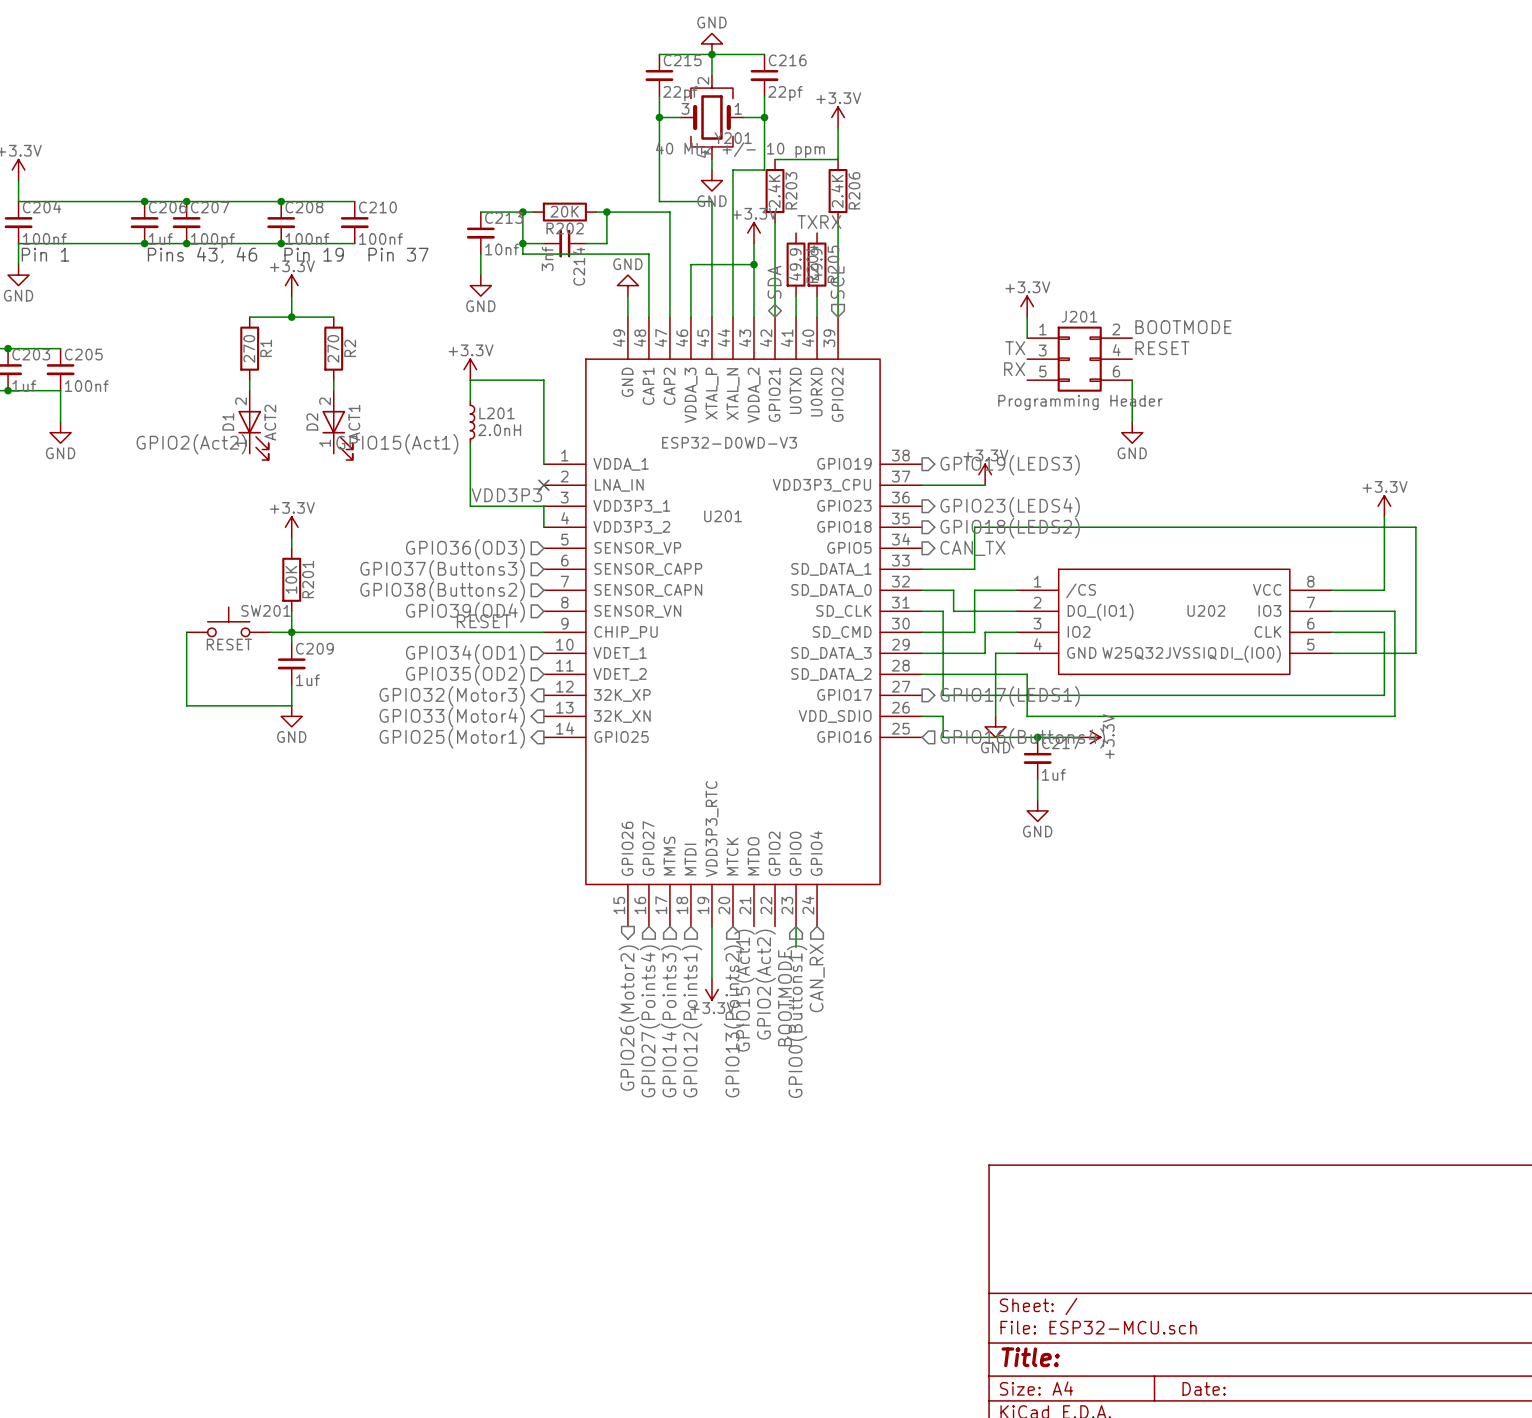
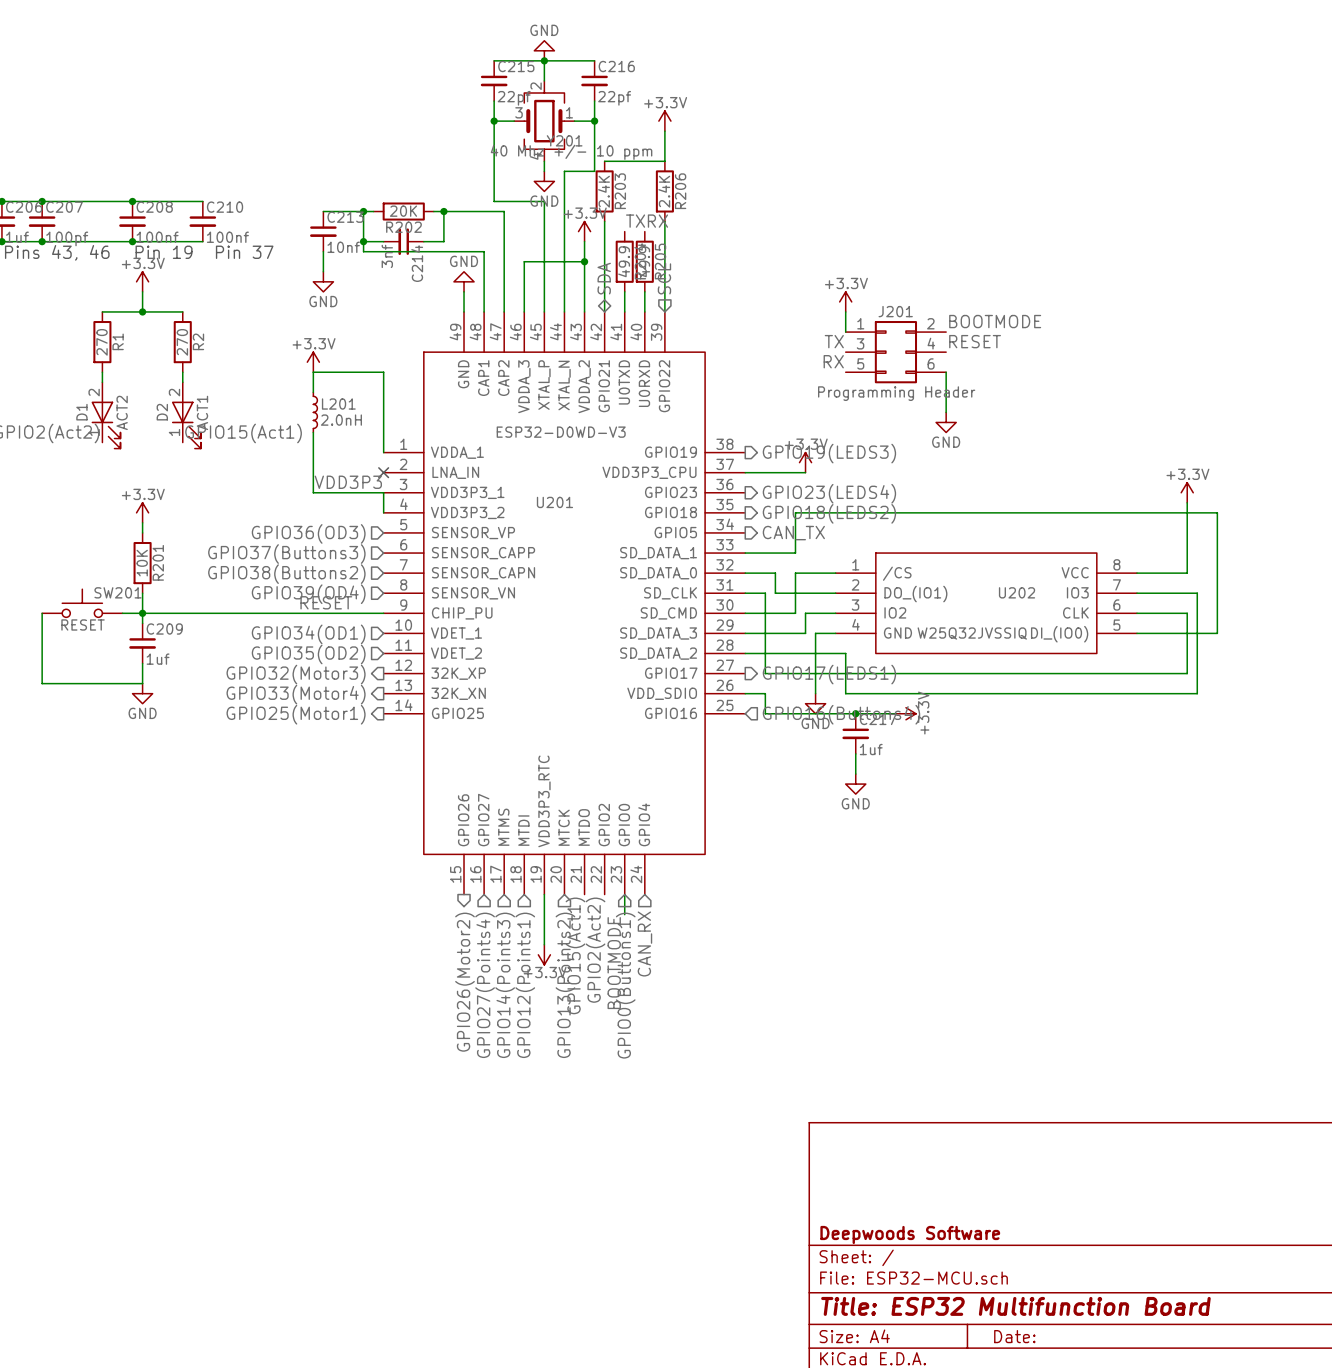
title block: none -> Deepwoods Software (910, 1234)
title block: Title: (1030, 1357) -> Title: ESP32 Multifunction Board (1015, 1306)

